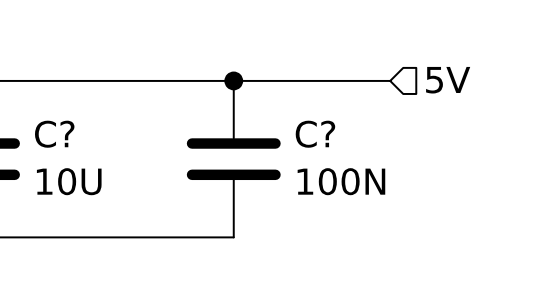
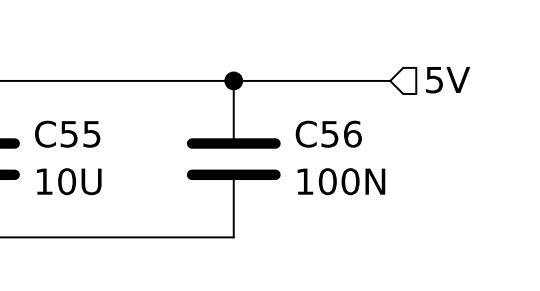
C? name: C? (54, 134) -> C55 (67, 134)
C? name: C? (315, 134) -> C56 (328, 134)

